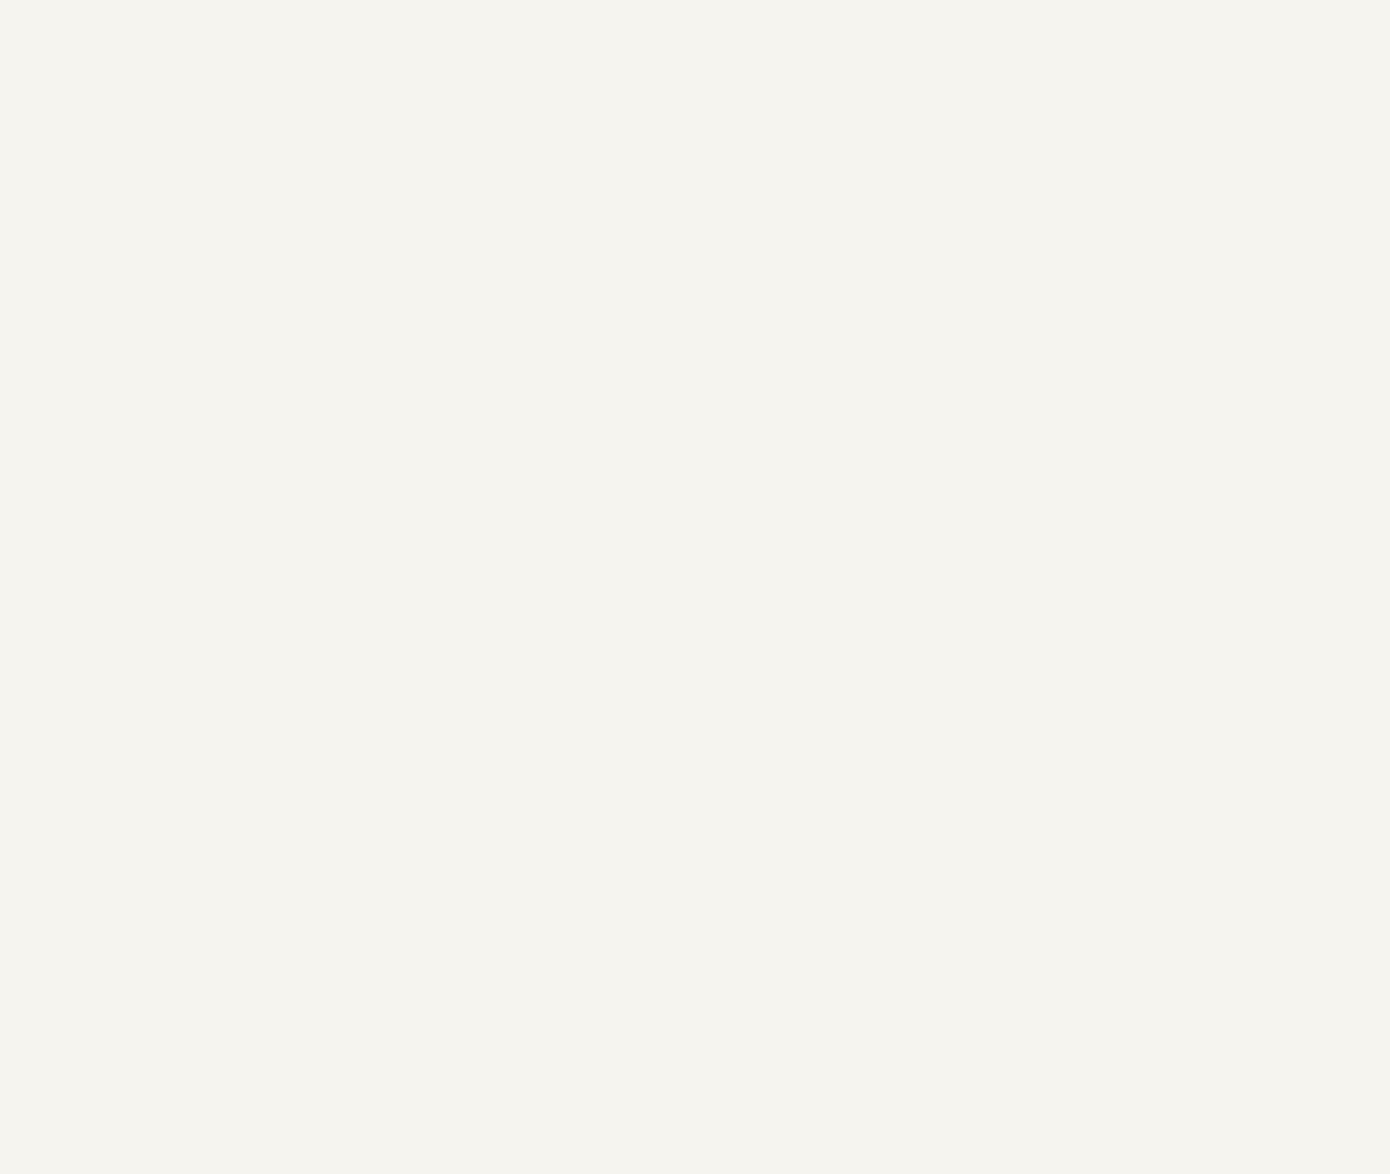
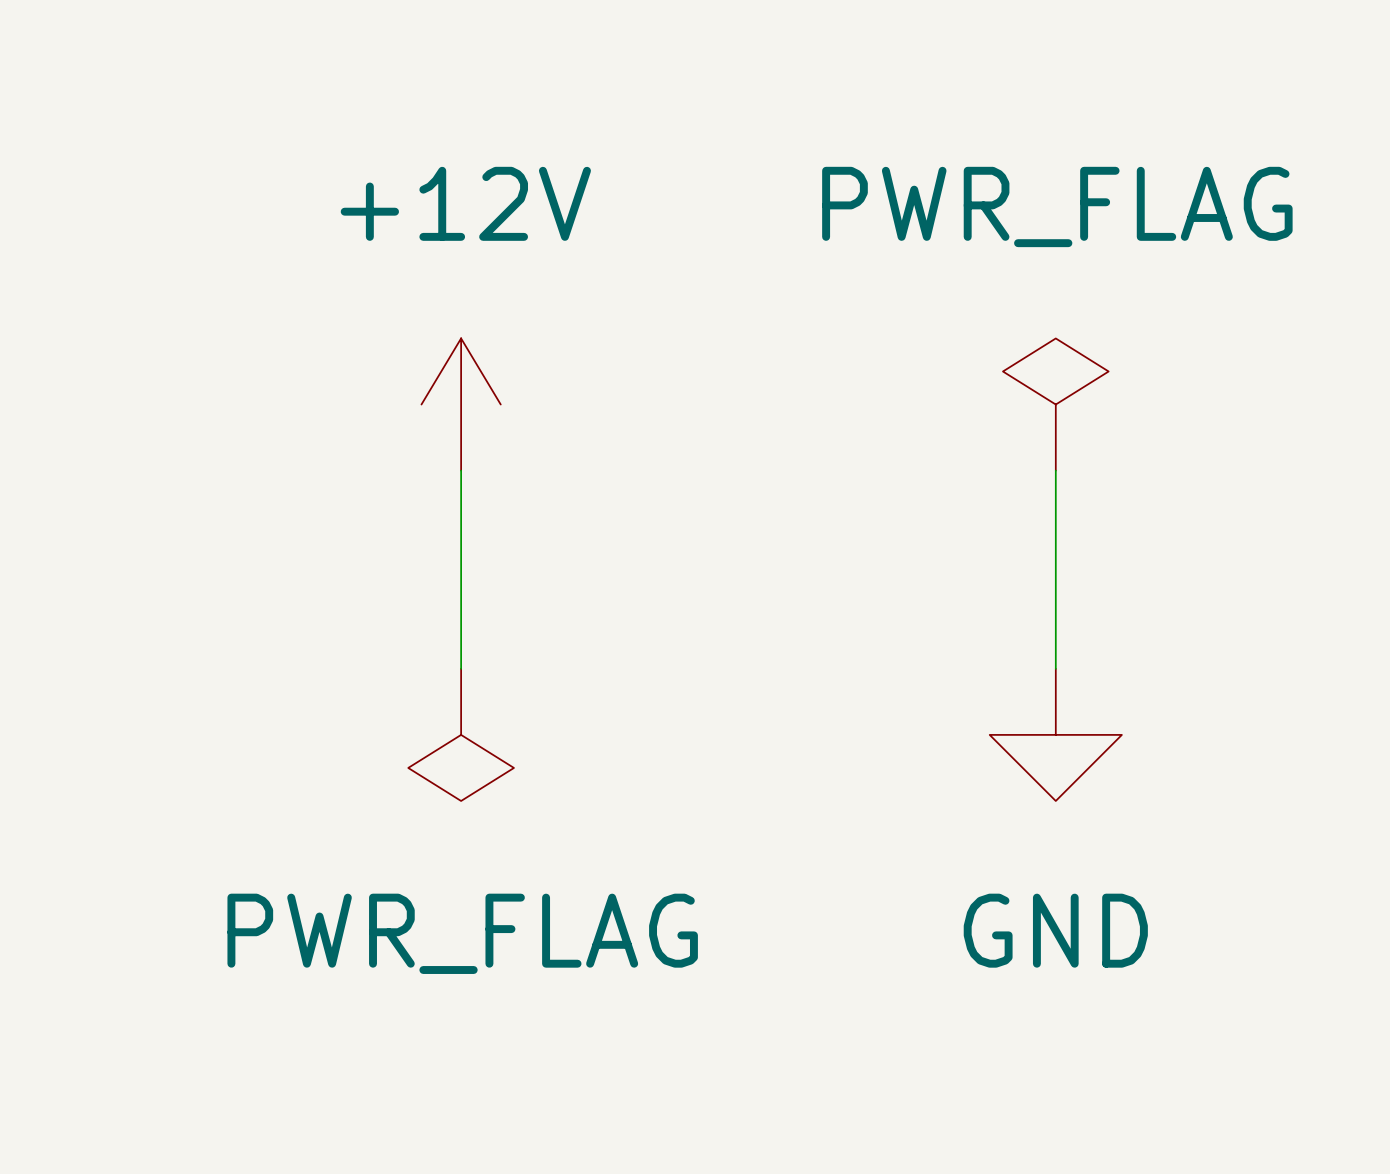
power symbol: none -> +12V (461, 404)
power symbol: none -> PWR_FLAG (1055, 404)
wire: none -> (461, 470) (461, 668)
wire: none -> (1055, 470) (1055, 668)
power symbol: none -> PWR_FLAG (461, 734)
power symbol: none -> GND (1055, 734)

